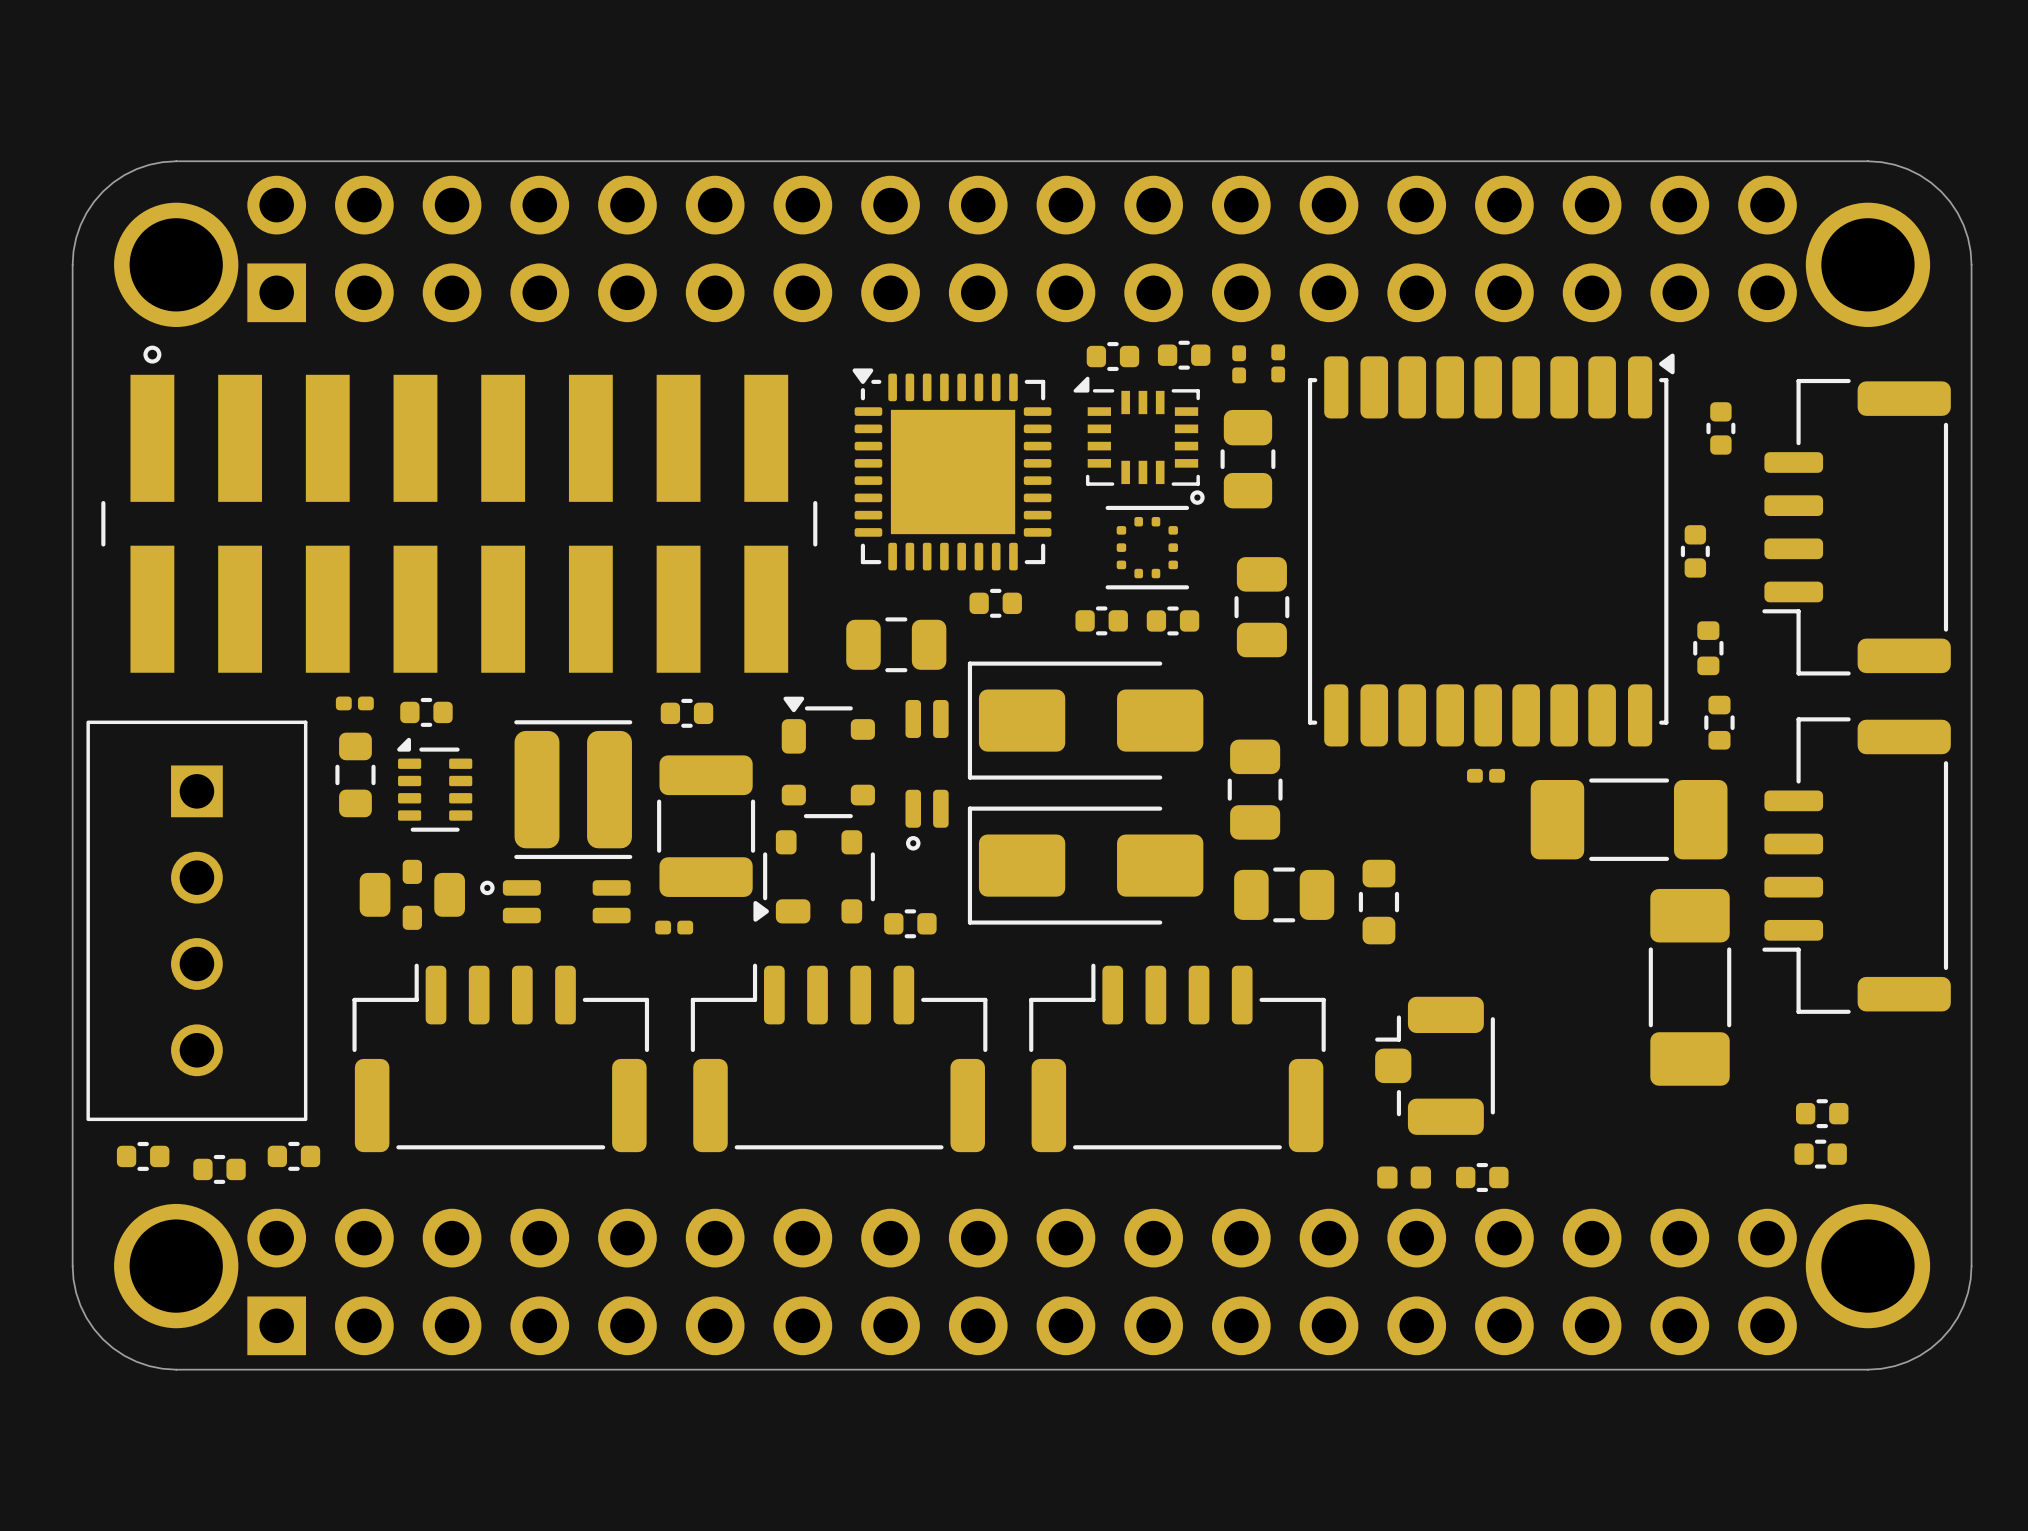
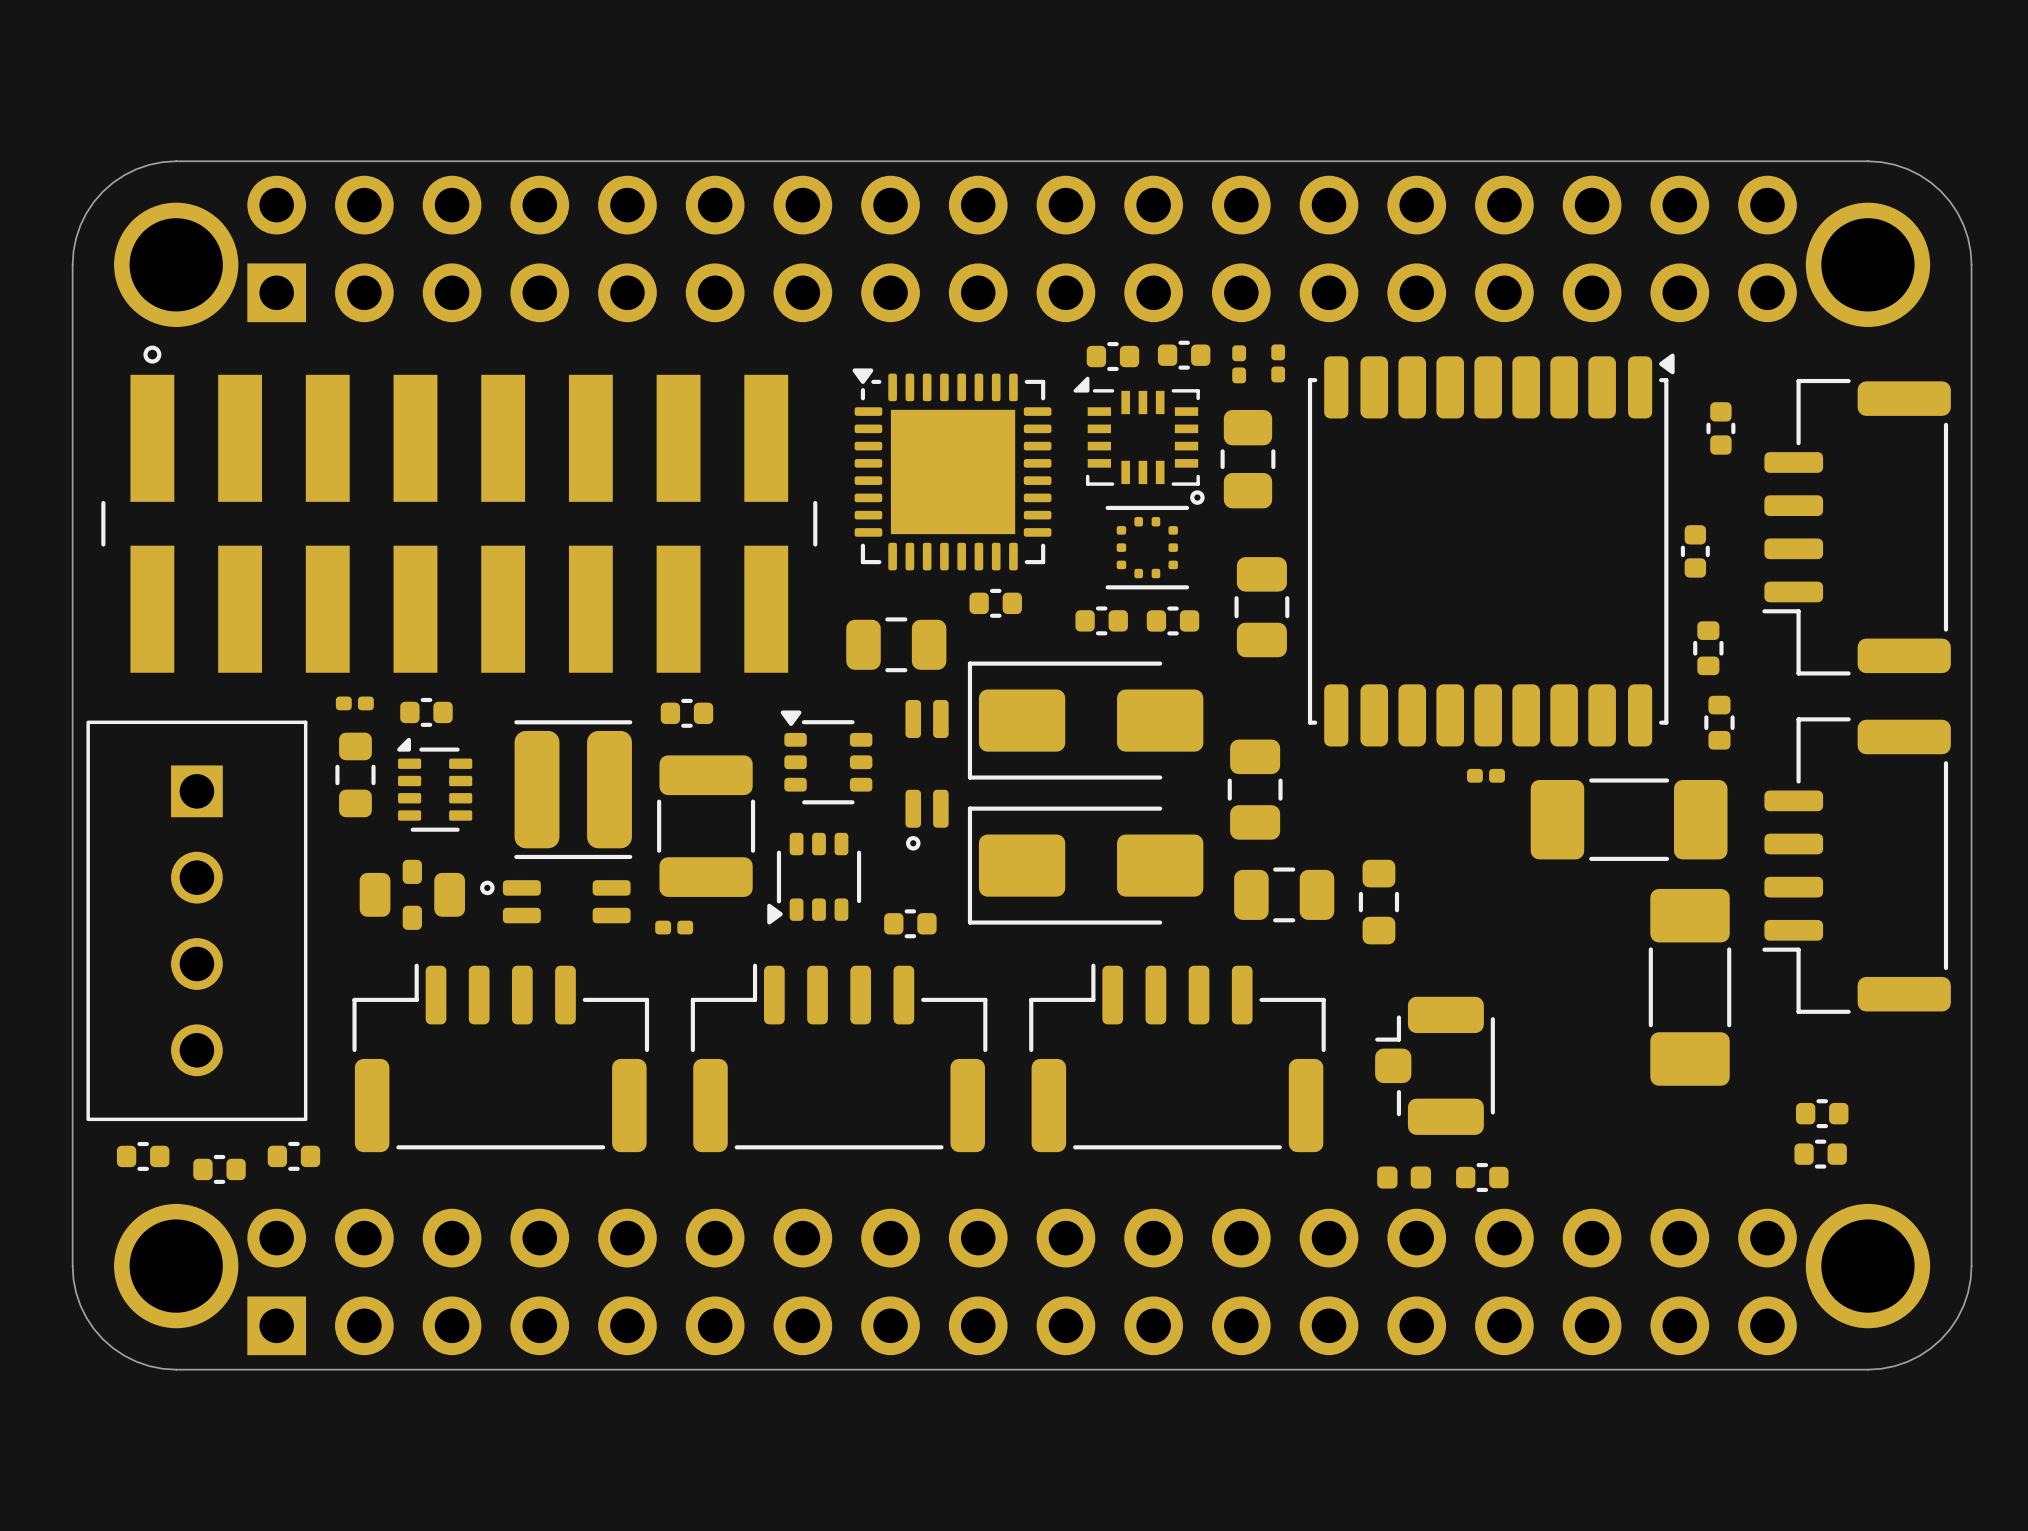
part footprint: [781, 696, 875, 819] -> [780, 710, 873, 805]
part footprint: [753, 830, 875, 924] -> [767, 832, 862, 925]

